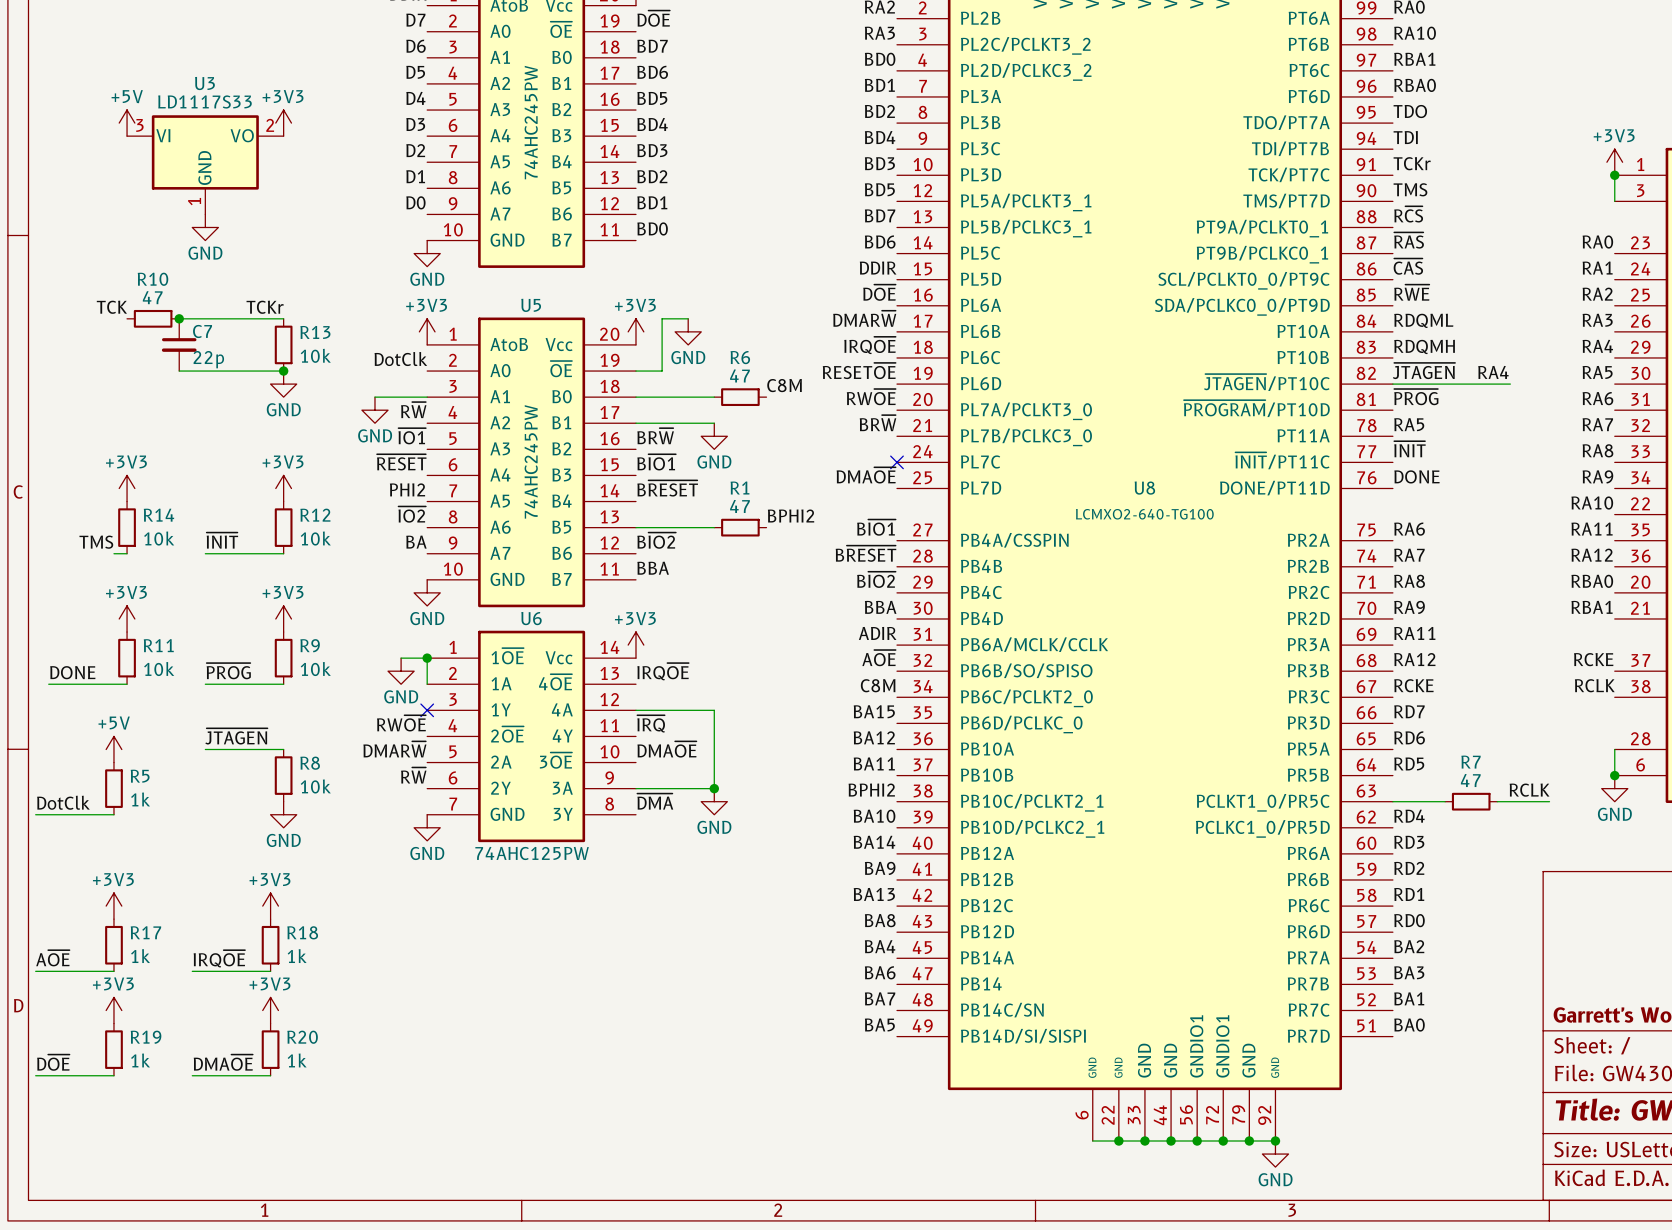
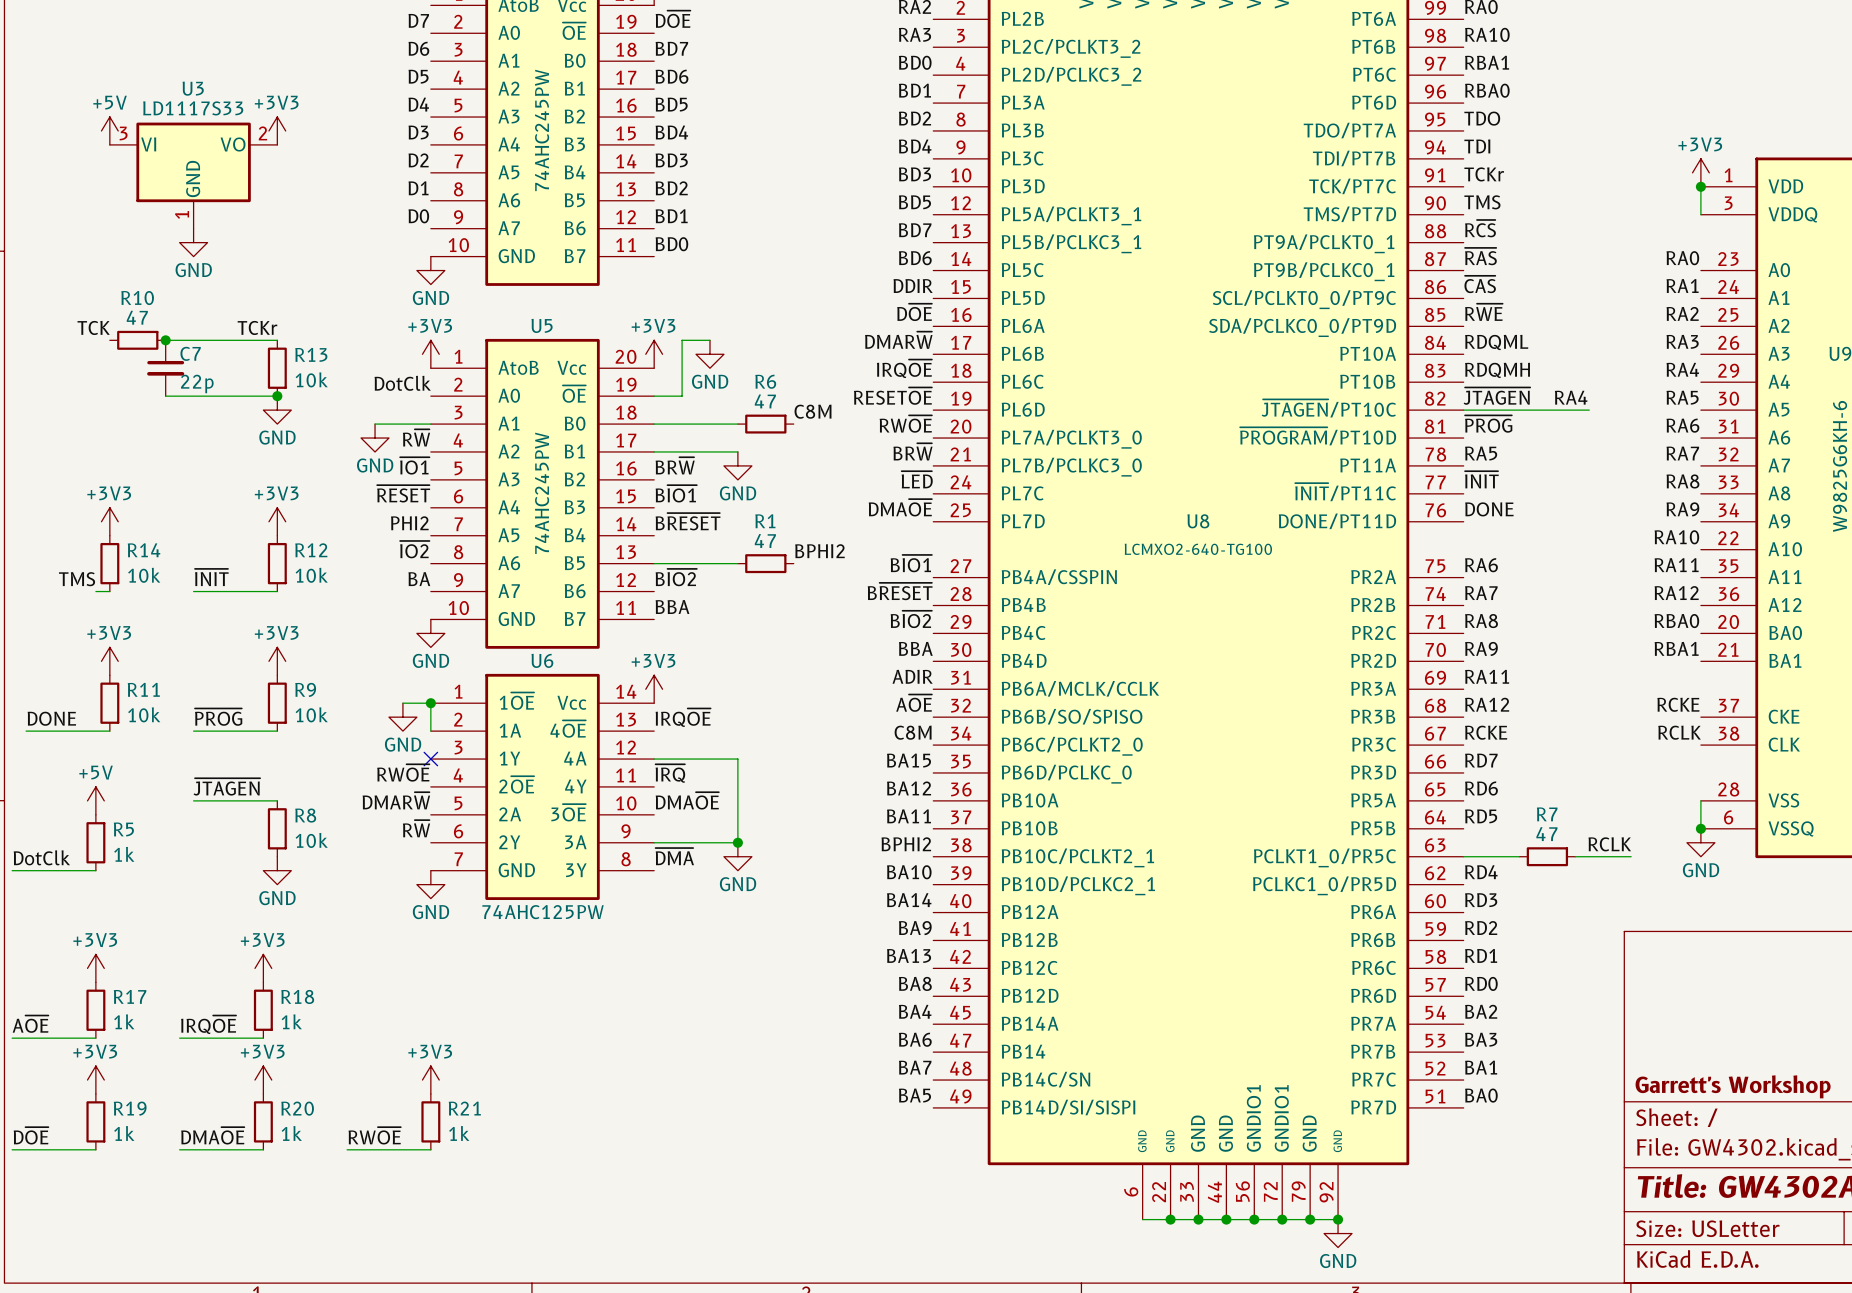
label: none -> ~{LED} (917, 479)
no-connect mark: (897, 462) -> none
power symbol: none -> +3V3 (430, 1080)
R21: none -> 1k (430, 1121)
label: none -> RW~{OE} (374, 1135)
wire: none -> (347, 1149) (430, 1149)

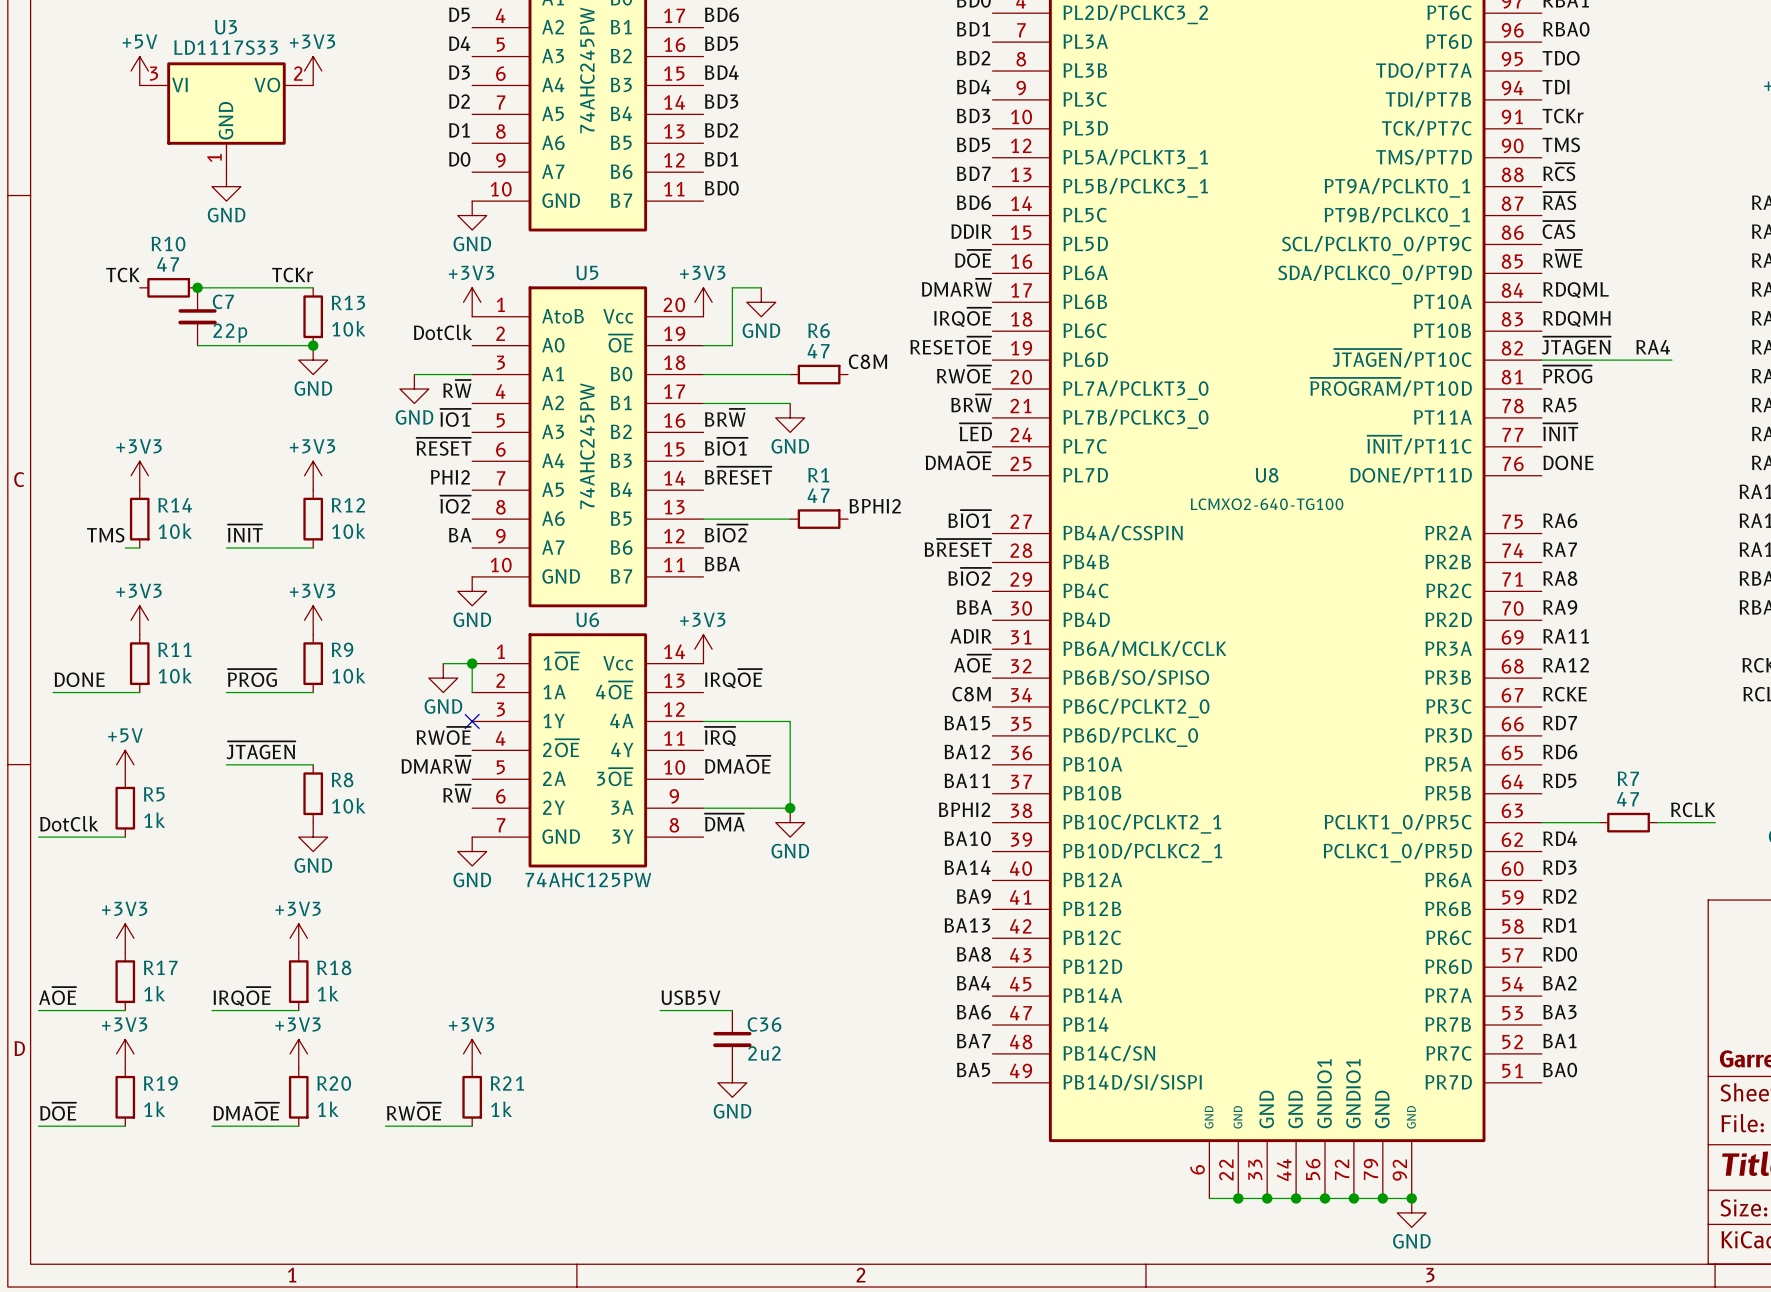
label: none -> USB5V (690, 997)
wire: none -> (660, 1010) (732, 1010)
C36: none -> 2u2 (732, 1039)
power symbol: none -> GND (732, 1082)

